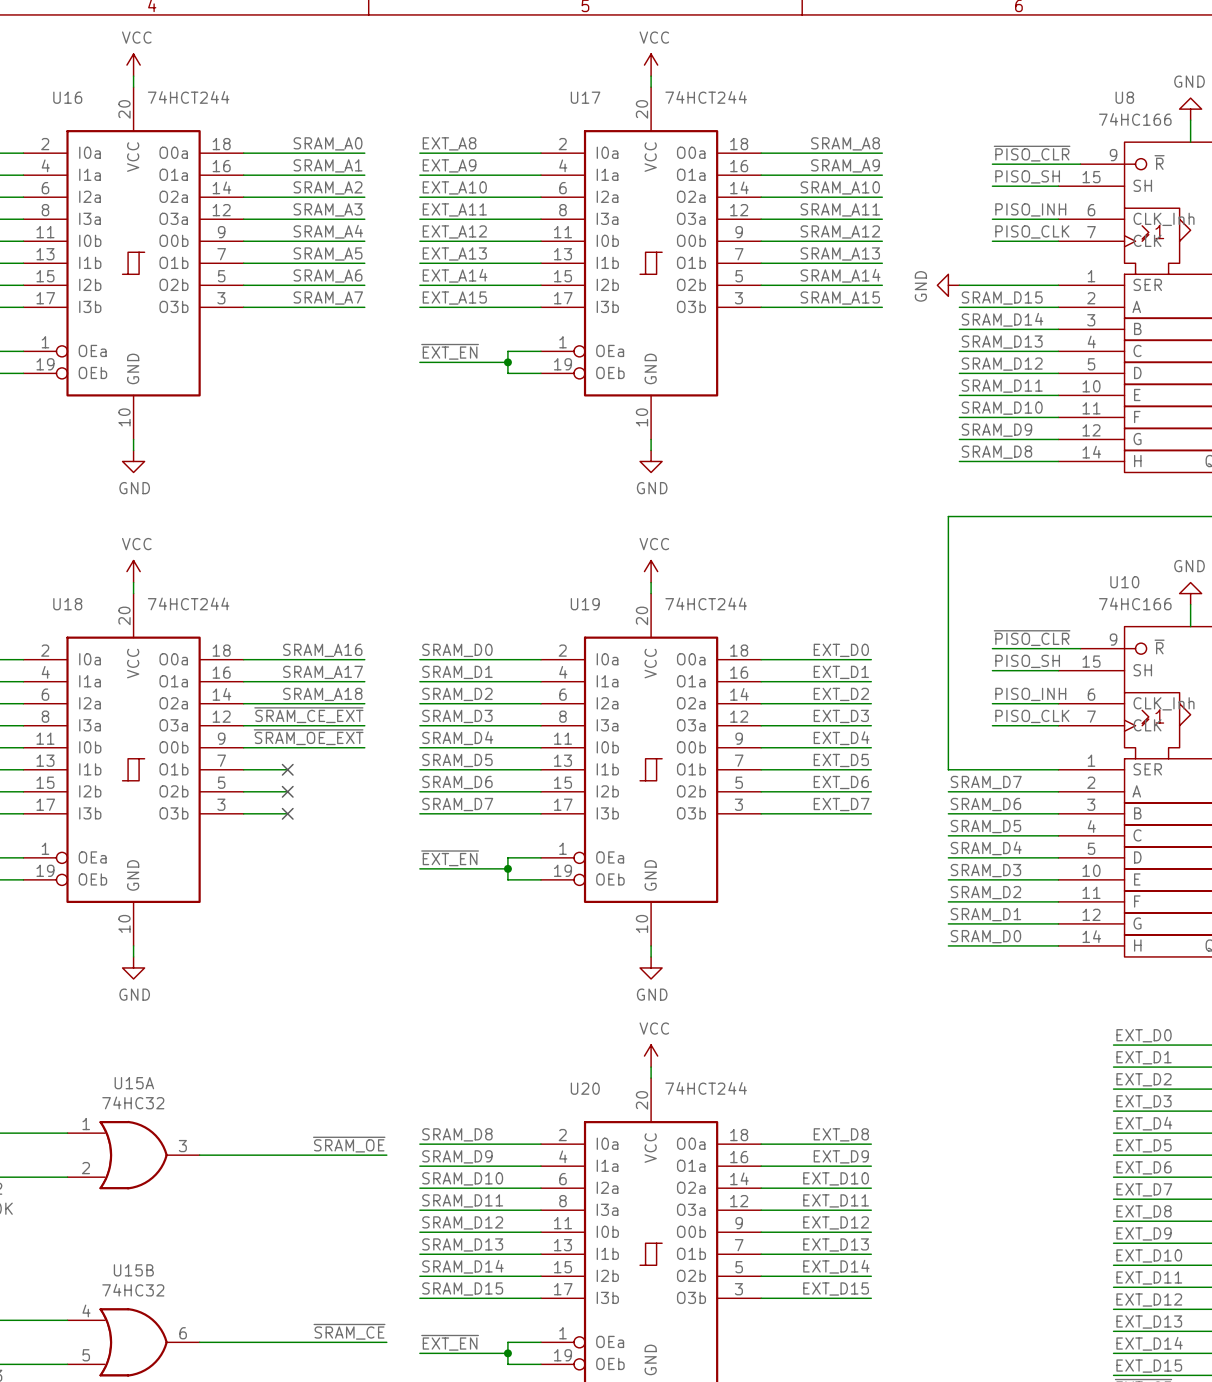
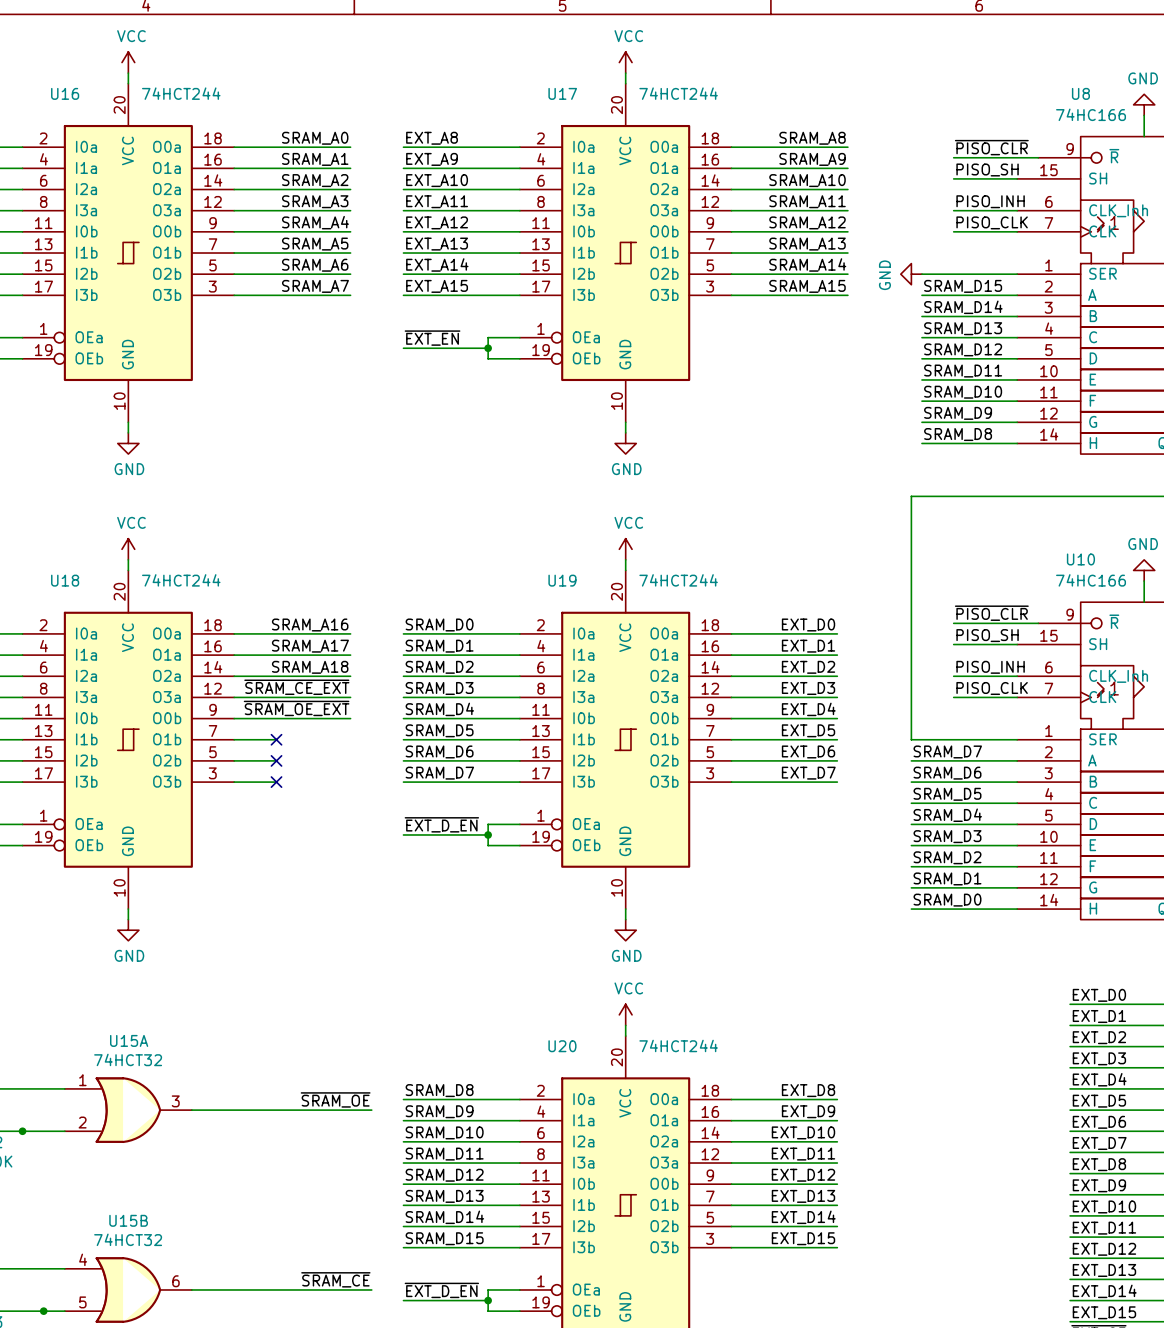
label: ~{EXT_EN} (450, 858) -> ~{EXT_D_EN} (441, 824)
U15A value: 74HC32 (133, 1102) -> 74HCT32 (128, 1059)
junction: none -> (22, 1131)
U15B value: 74HC32 (133, 1290) -> 74HCT32 (128, 1239)
label: ~{EXT_EN} (450, 1342) -> ~{EXT_D_EN} (441, 1290)
junction: none -> (43, 1311)

